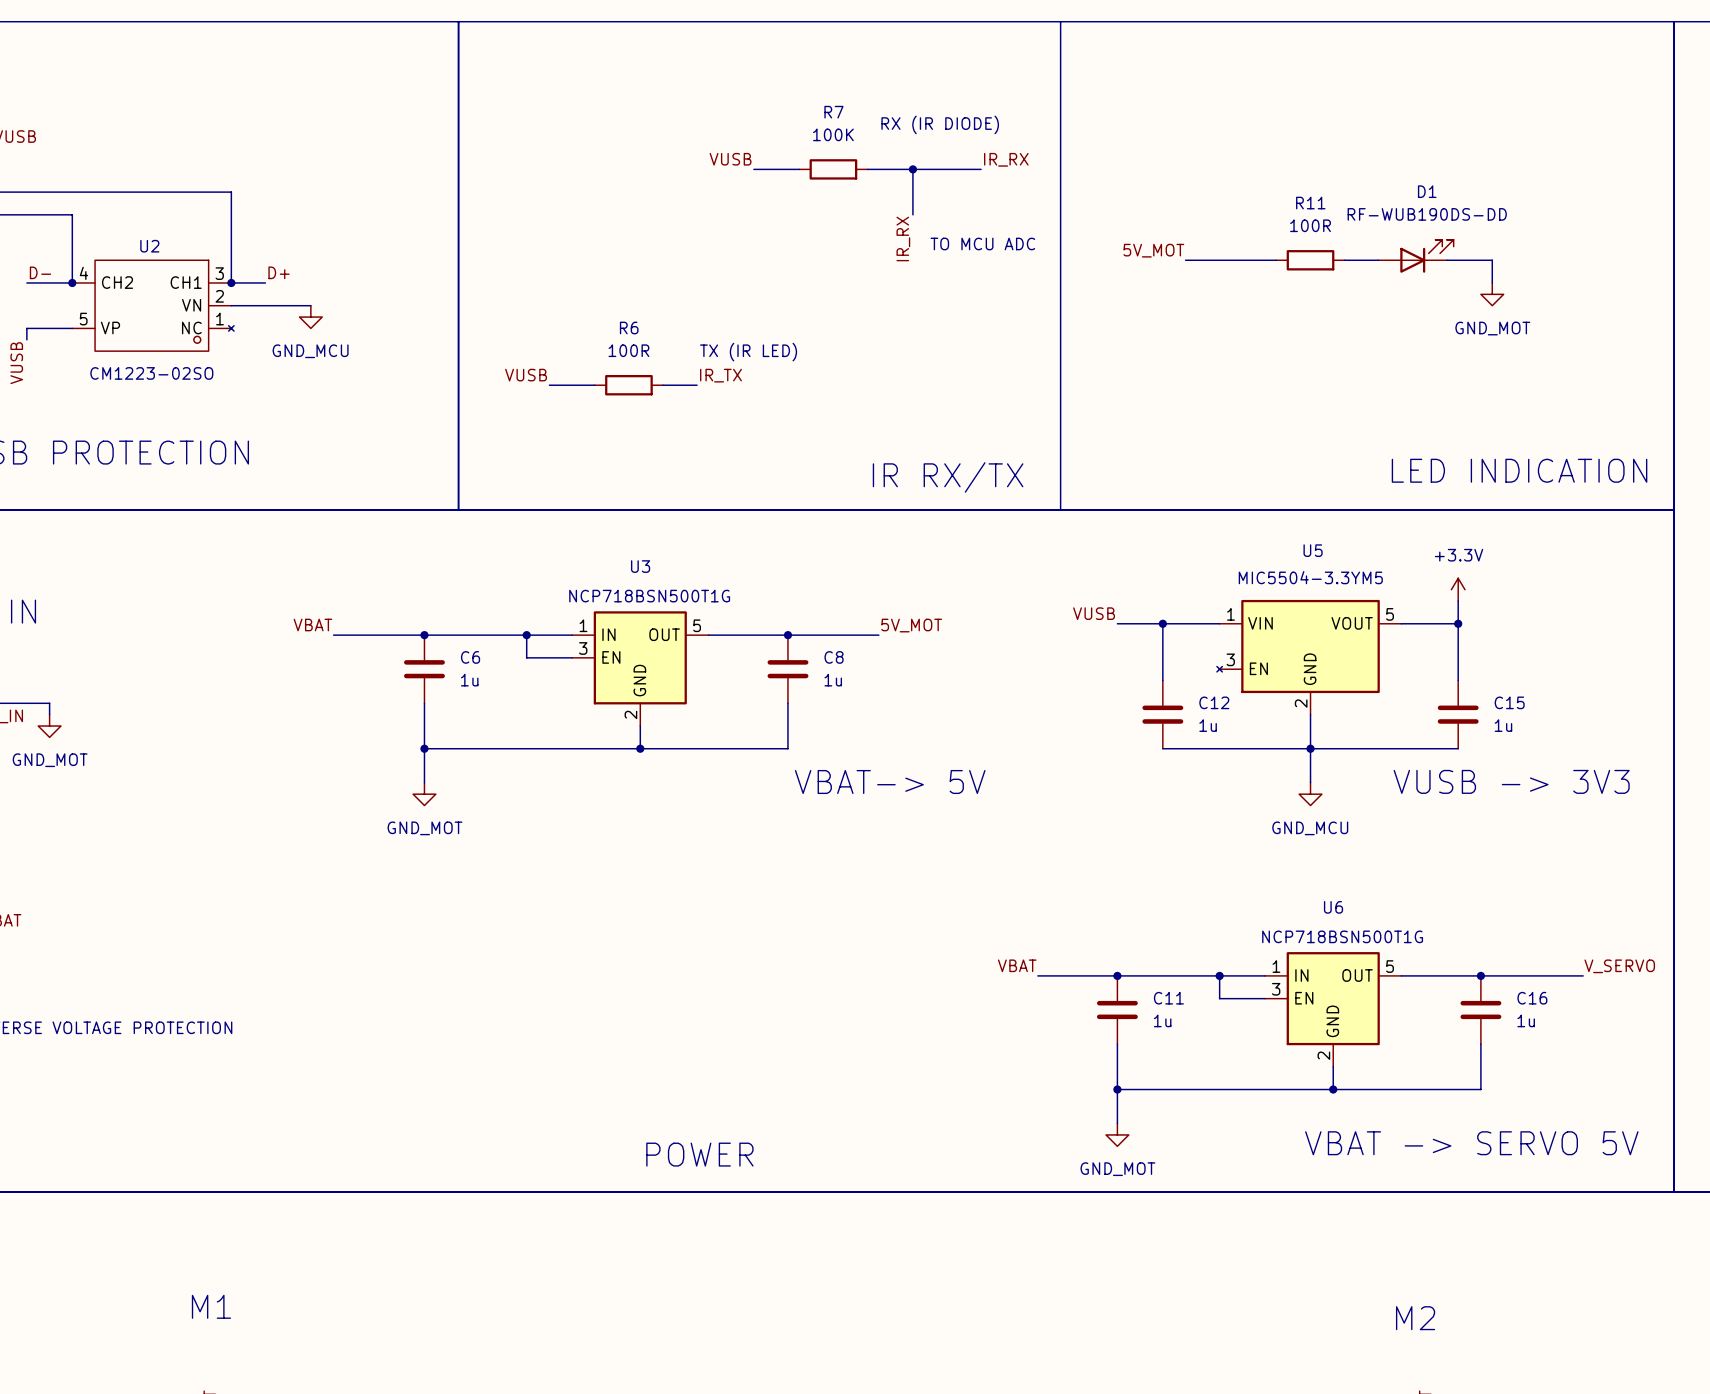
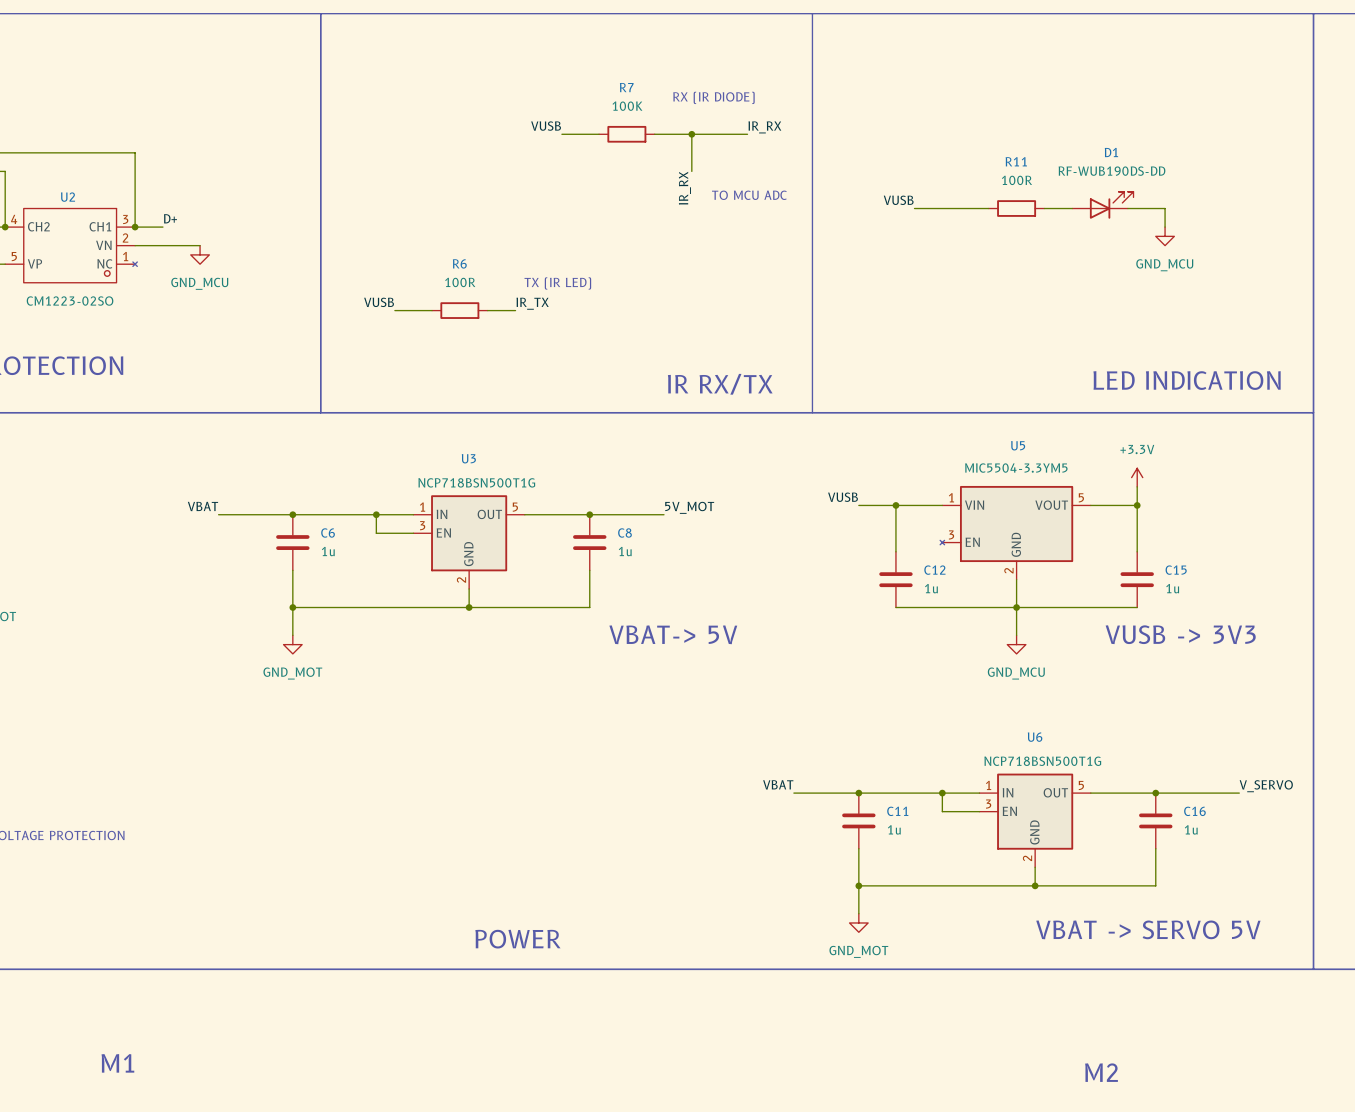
label: 5V_MOT (1153, 250) -> VUSB (898, 200)
power symbol: GND_MOT (1492, 294) -> GND_MCU (1165, 236)

